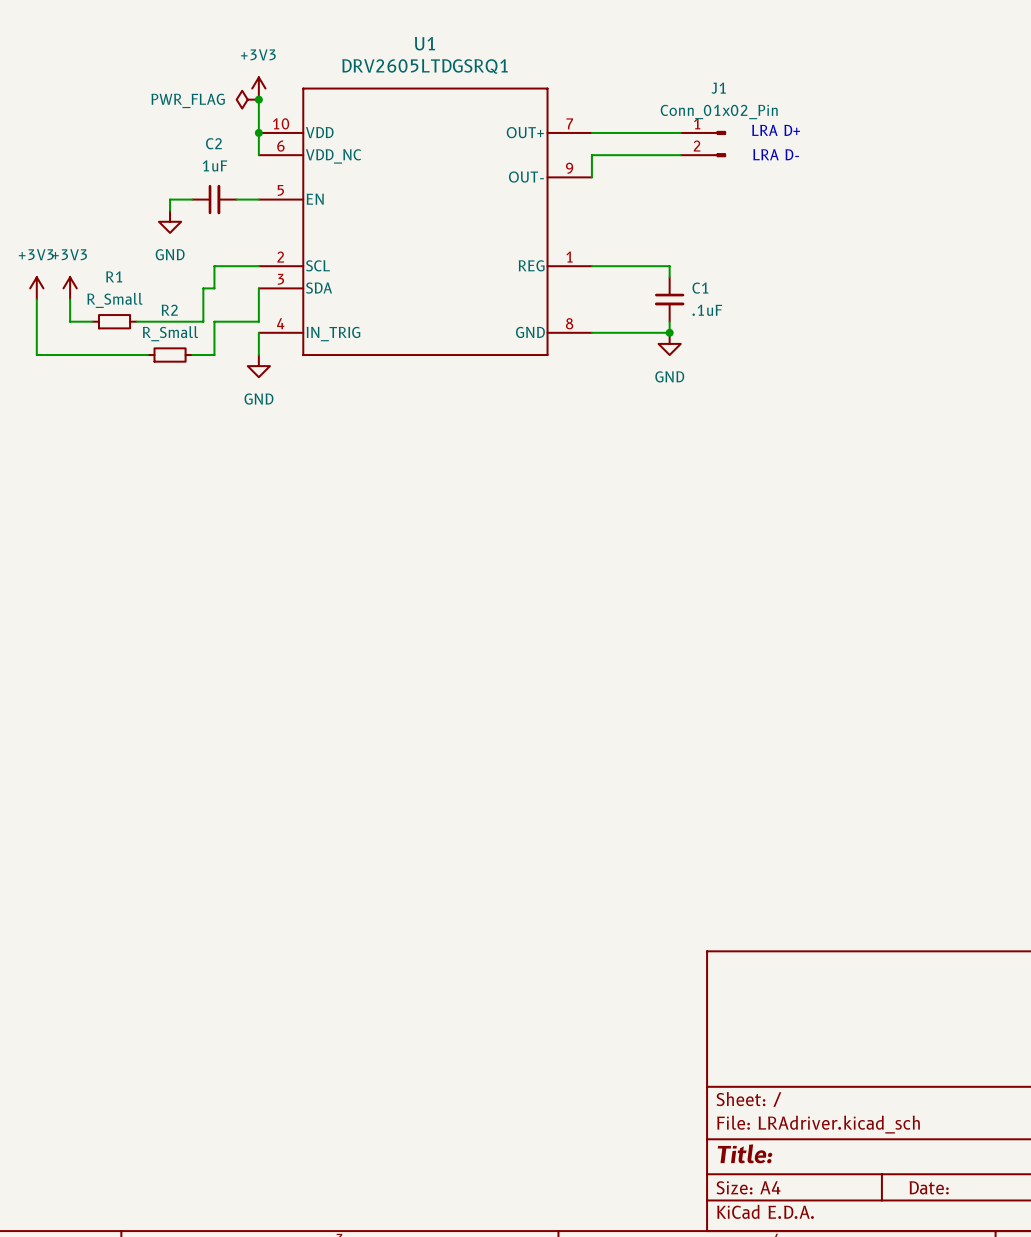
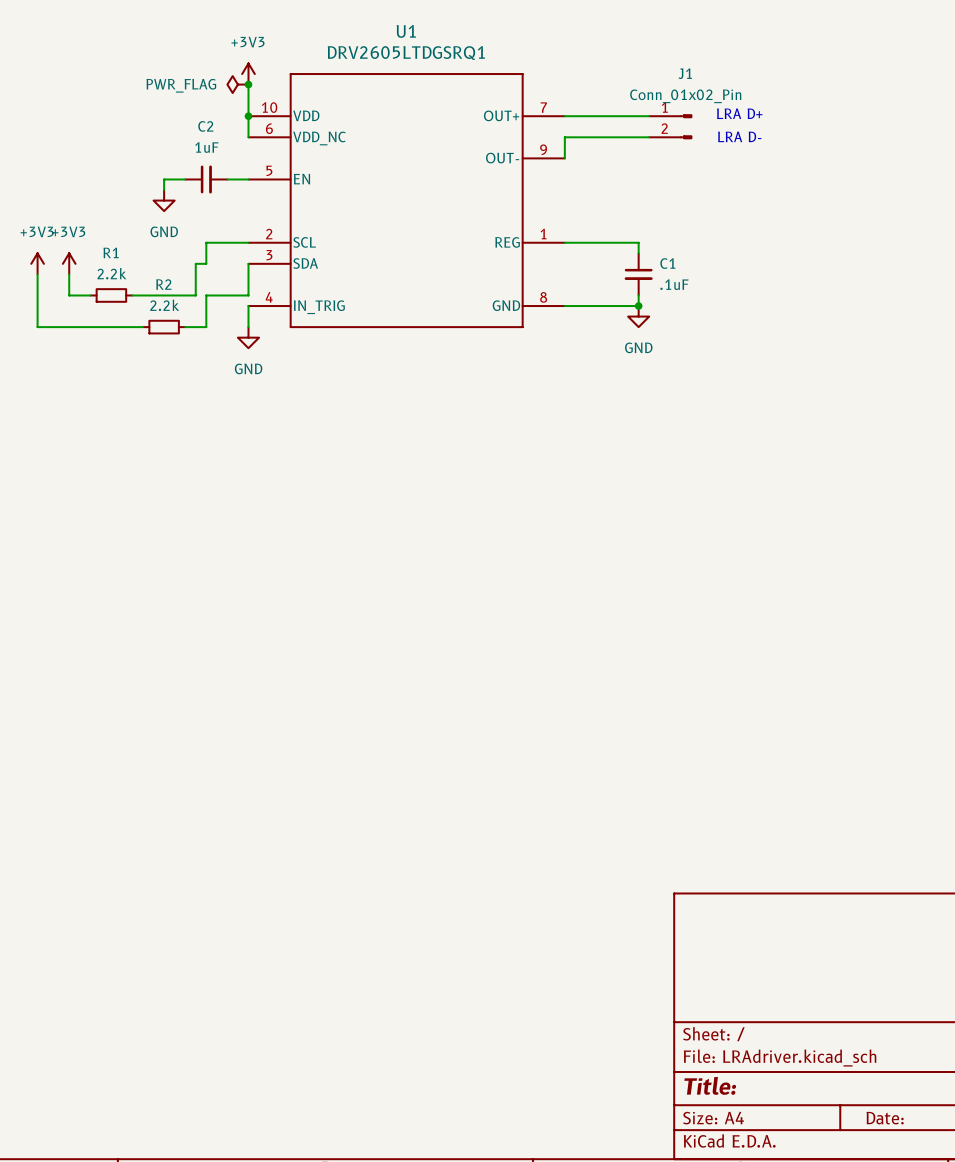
R1 value: R_Small (114, 300) -> 2.2k (111, 273)
R2 value: R_Small (170, 333) -> 2.2k (164, 305)

